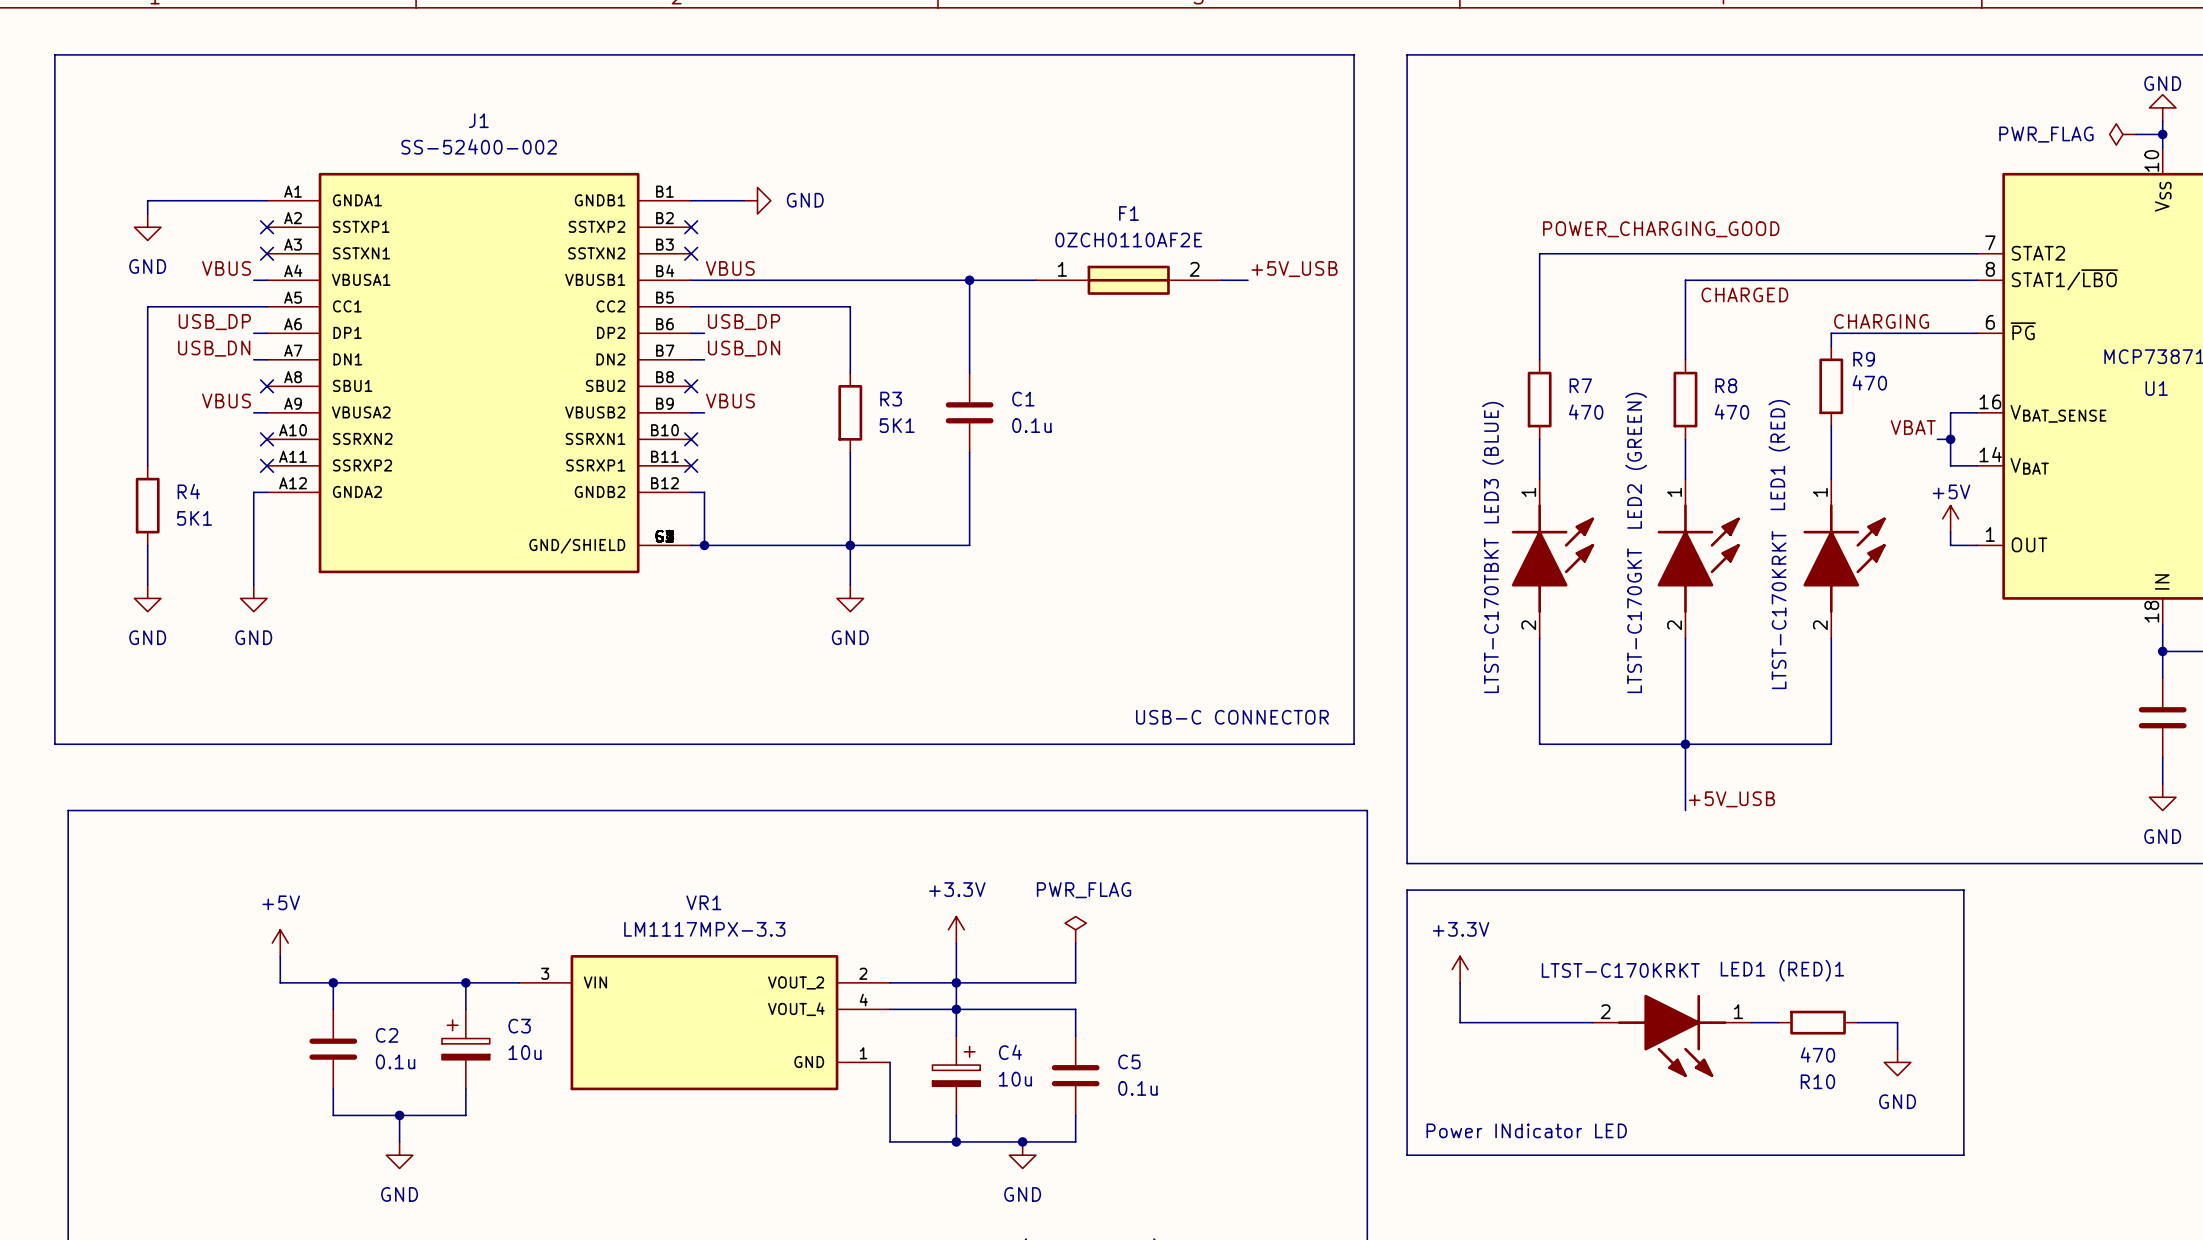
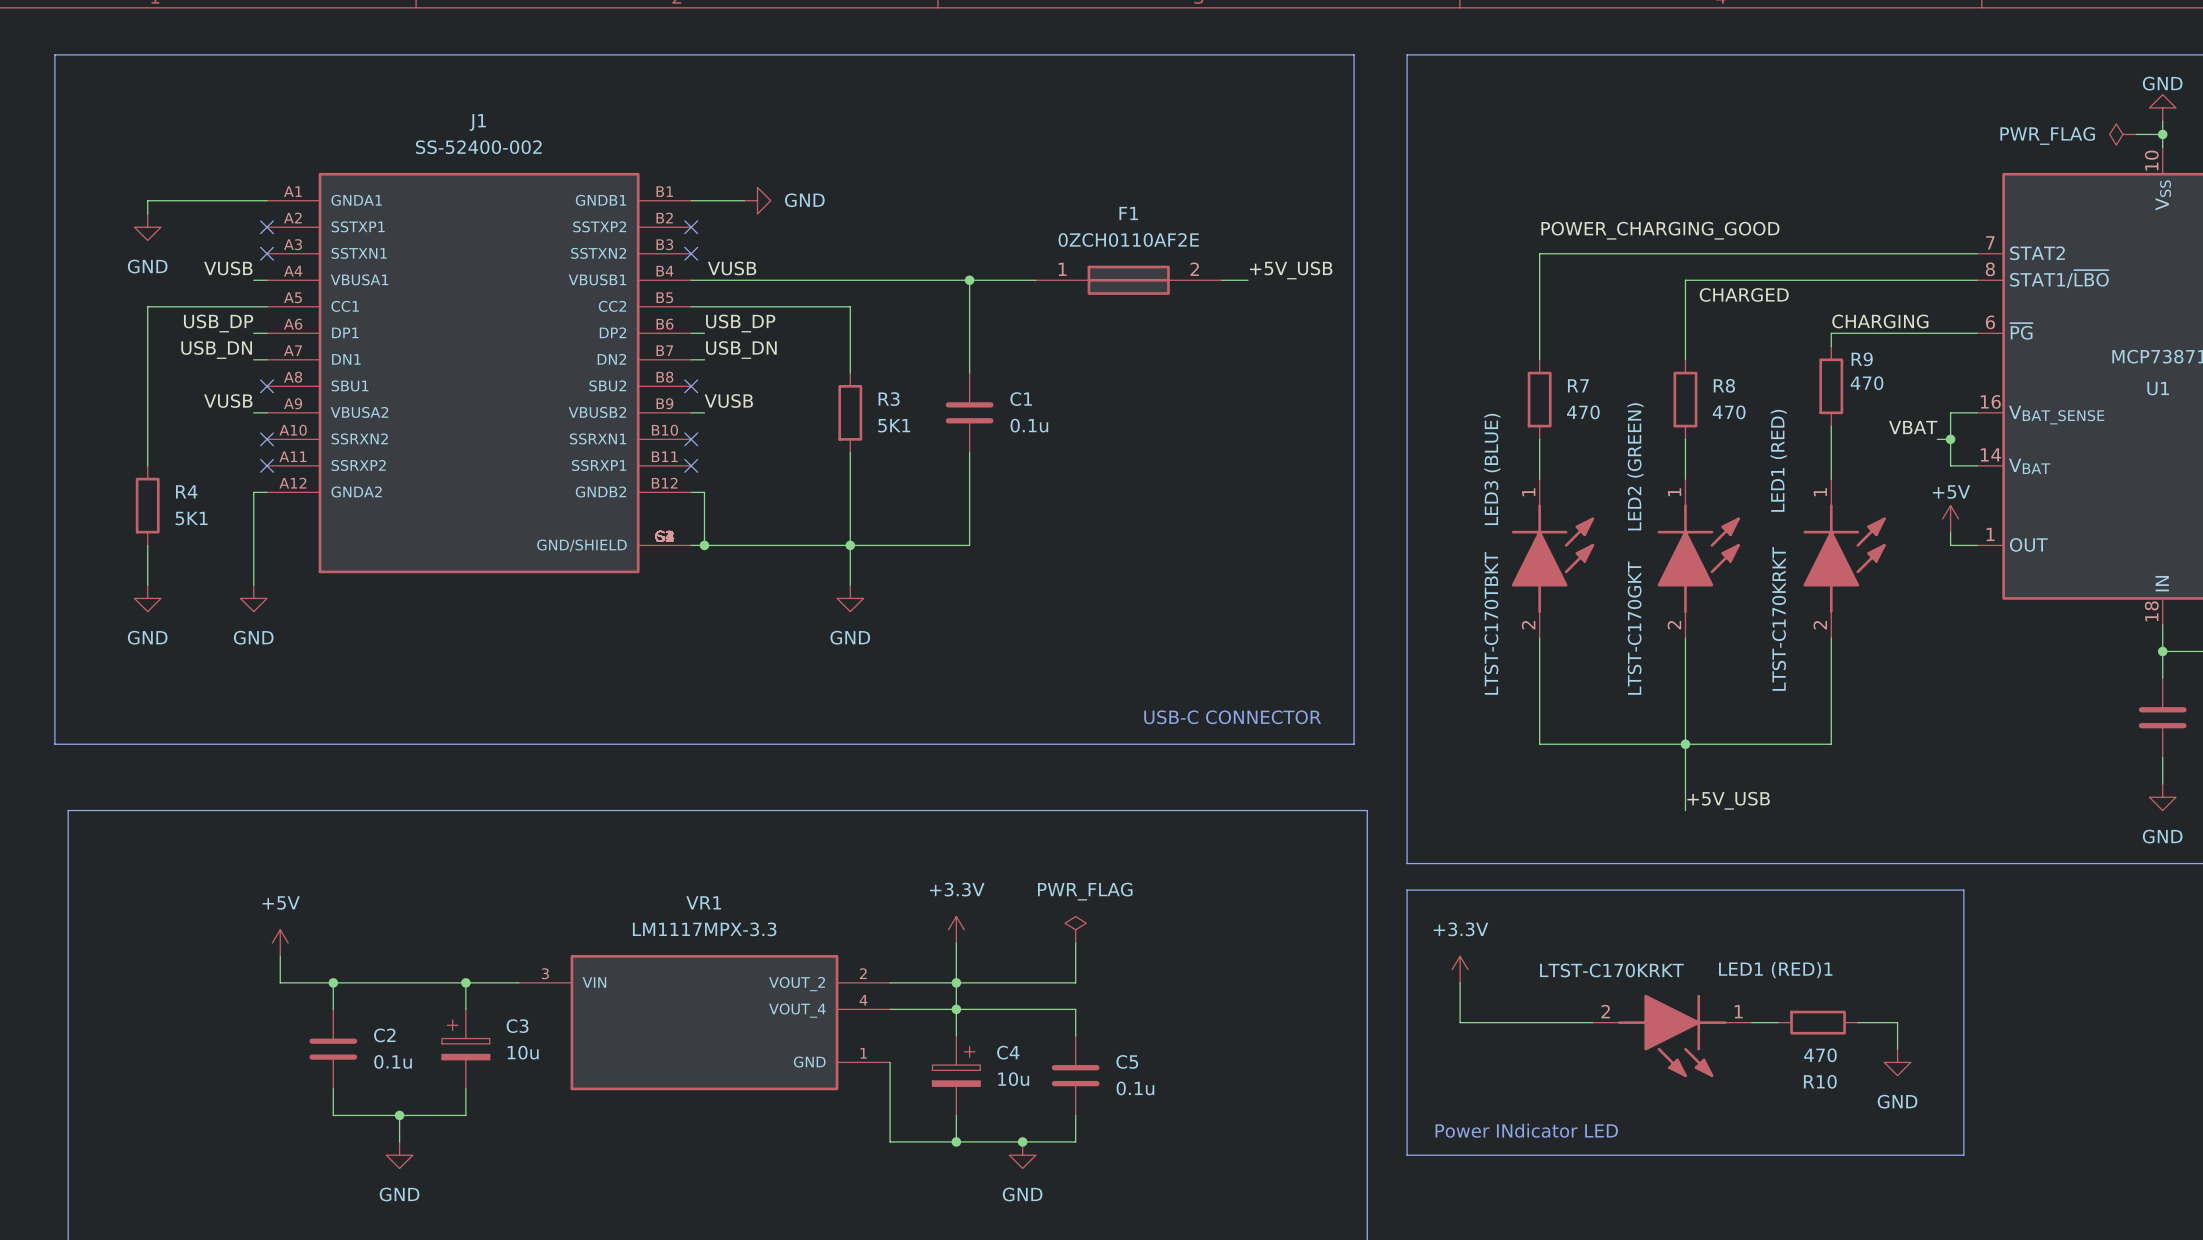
label: VBUS (226, 268) -> VUSB (228, 268)
label: VBUS (730, 268) -> VUSB (732, 268)
label: VBUS (226, 401) -> VUSB (228, 401)
label: VBUS (730, 401) -> VUSB (728, 401)

